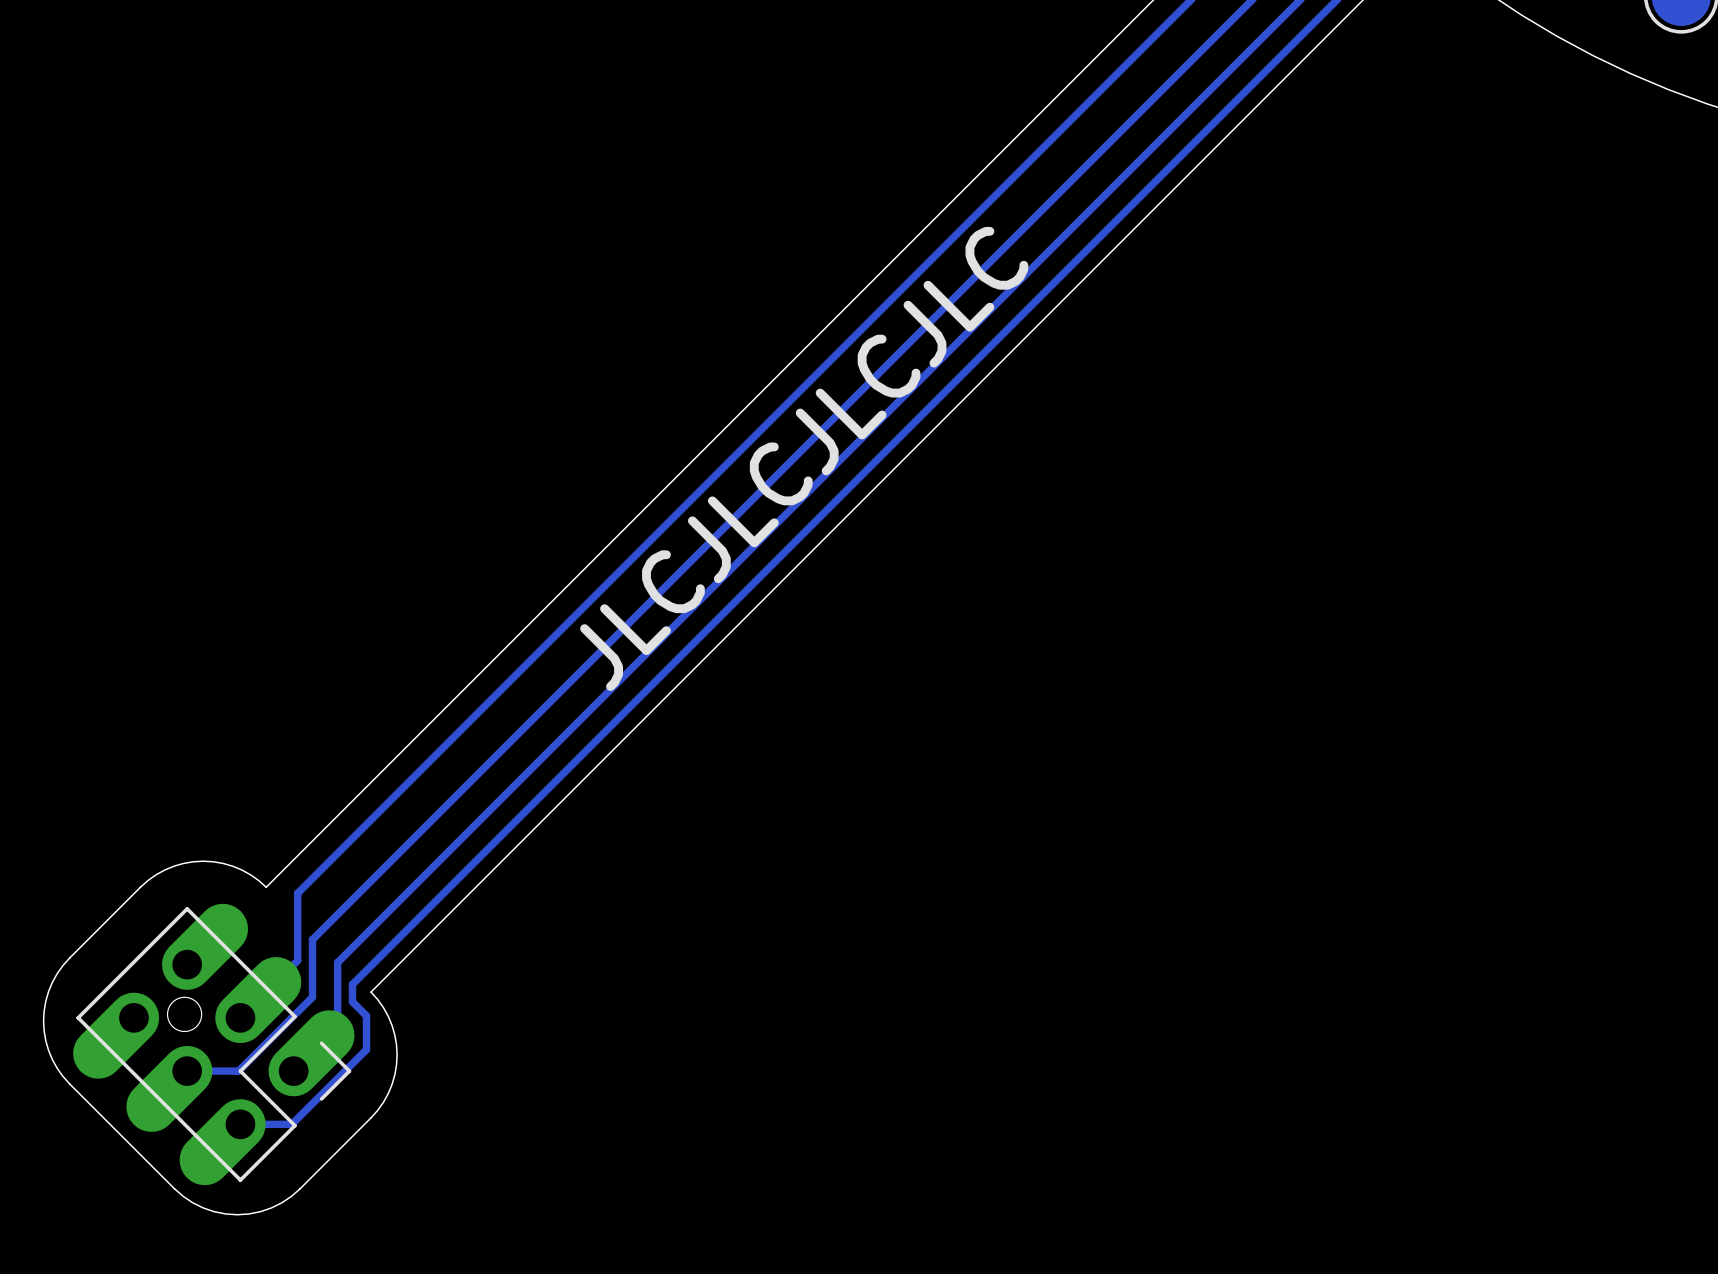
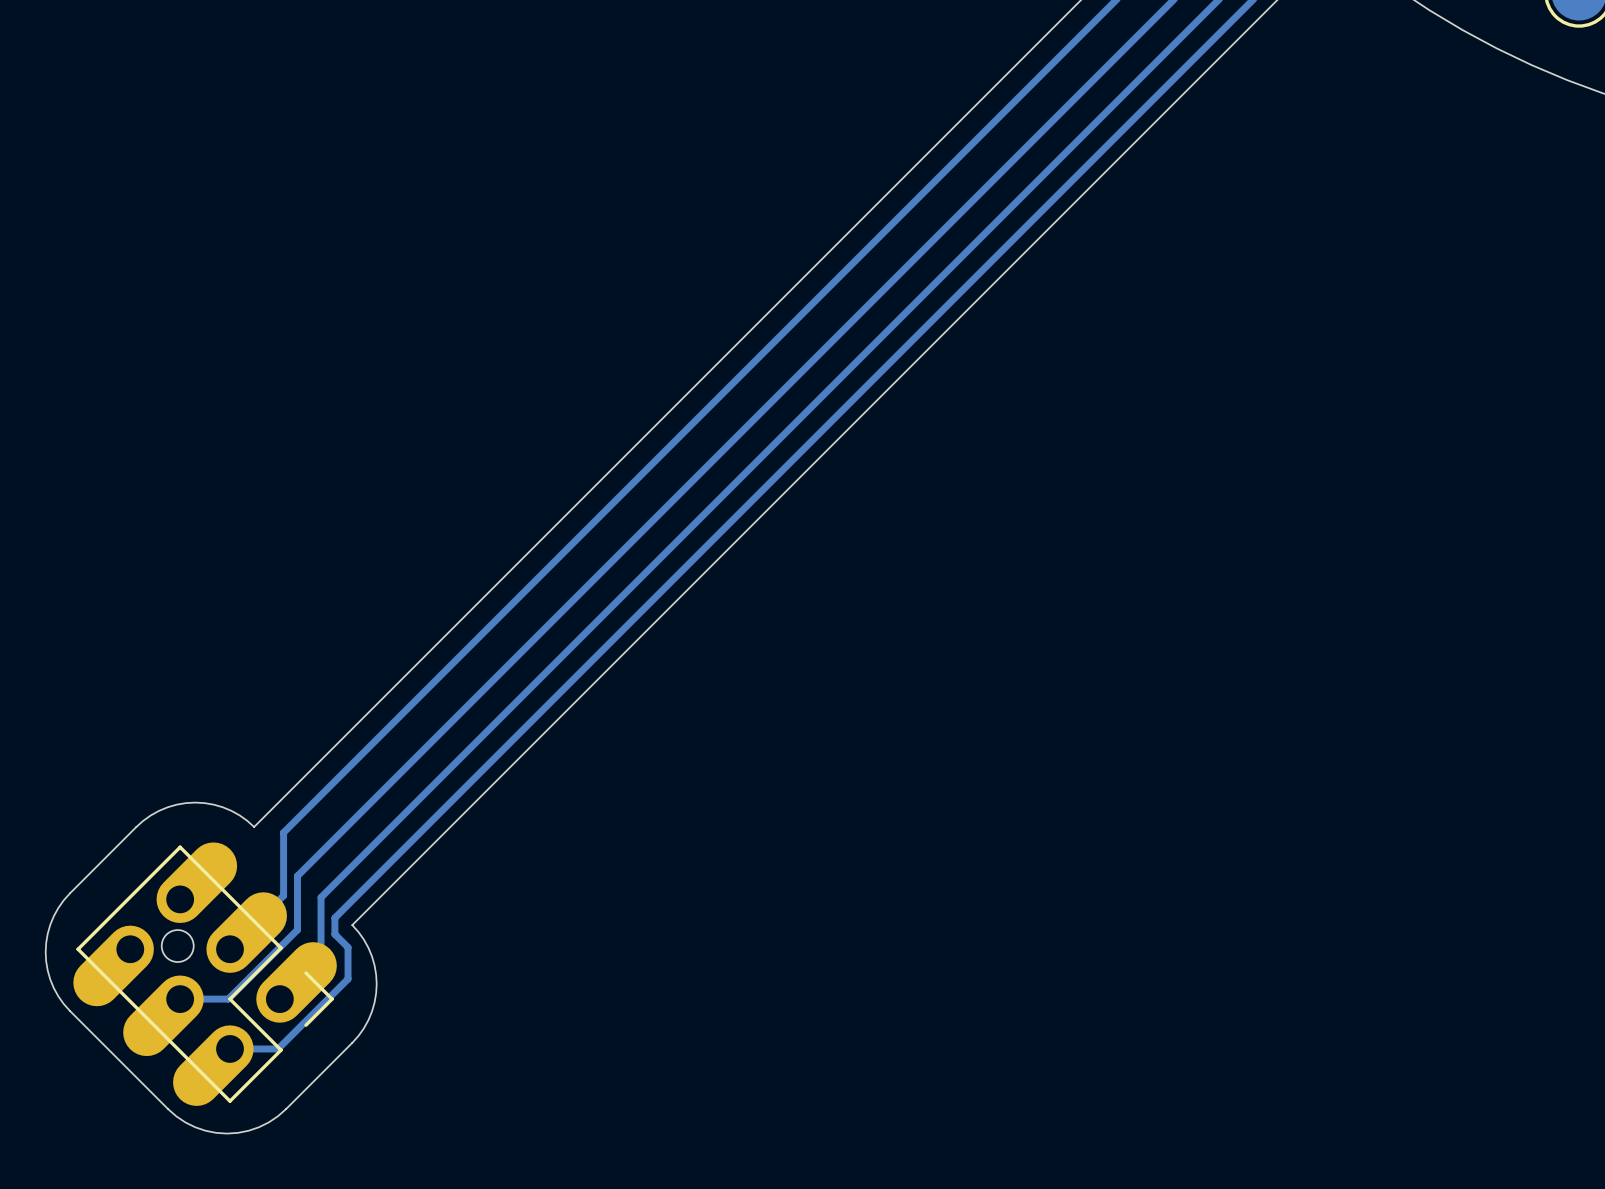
text: JLCJLCJLCJLC (804, 458) -> none

